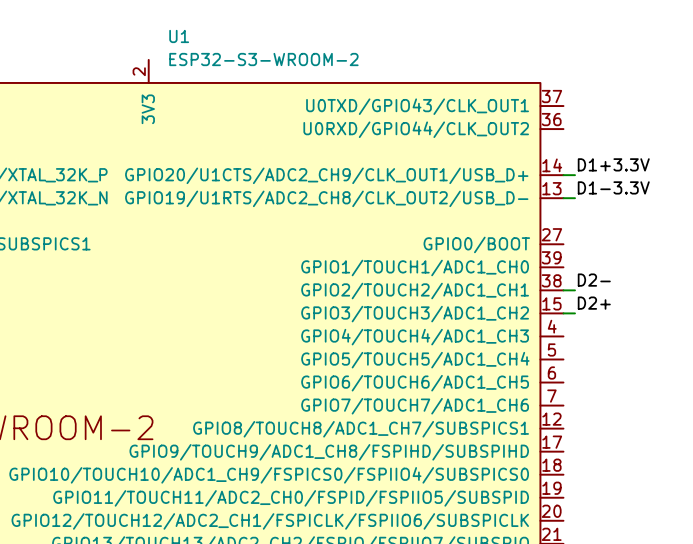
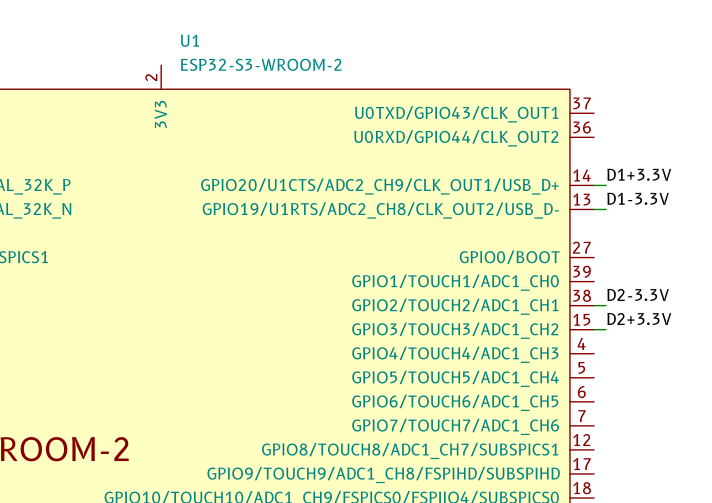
label: D2- (594, 280) -> D2-3.3V (638, 295)
label: D2+ (594, 303) -> D2+3.3V (639, 319)

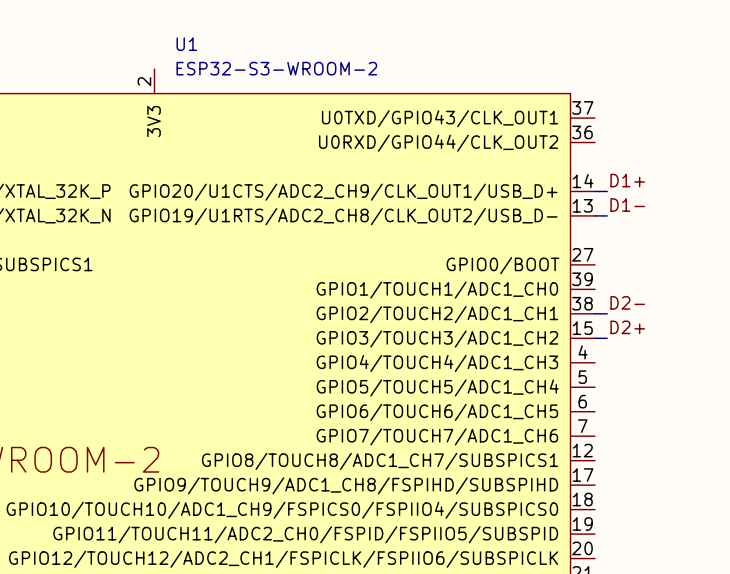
label: D1+3.3V (639, 174) -> D1+ (627, 180)
label: D1-3.3V (638, 198) -> D1- (627, 205)
label: D2-3.3V (638, 295) -> D2- (627, 302)
label: D2+3.3V (639, 319) -> D2+ (627, 327)

